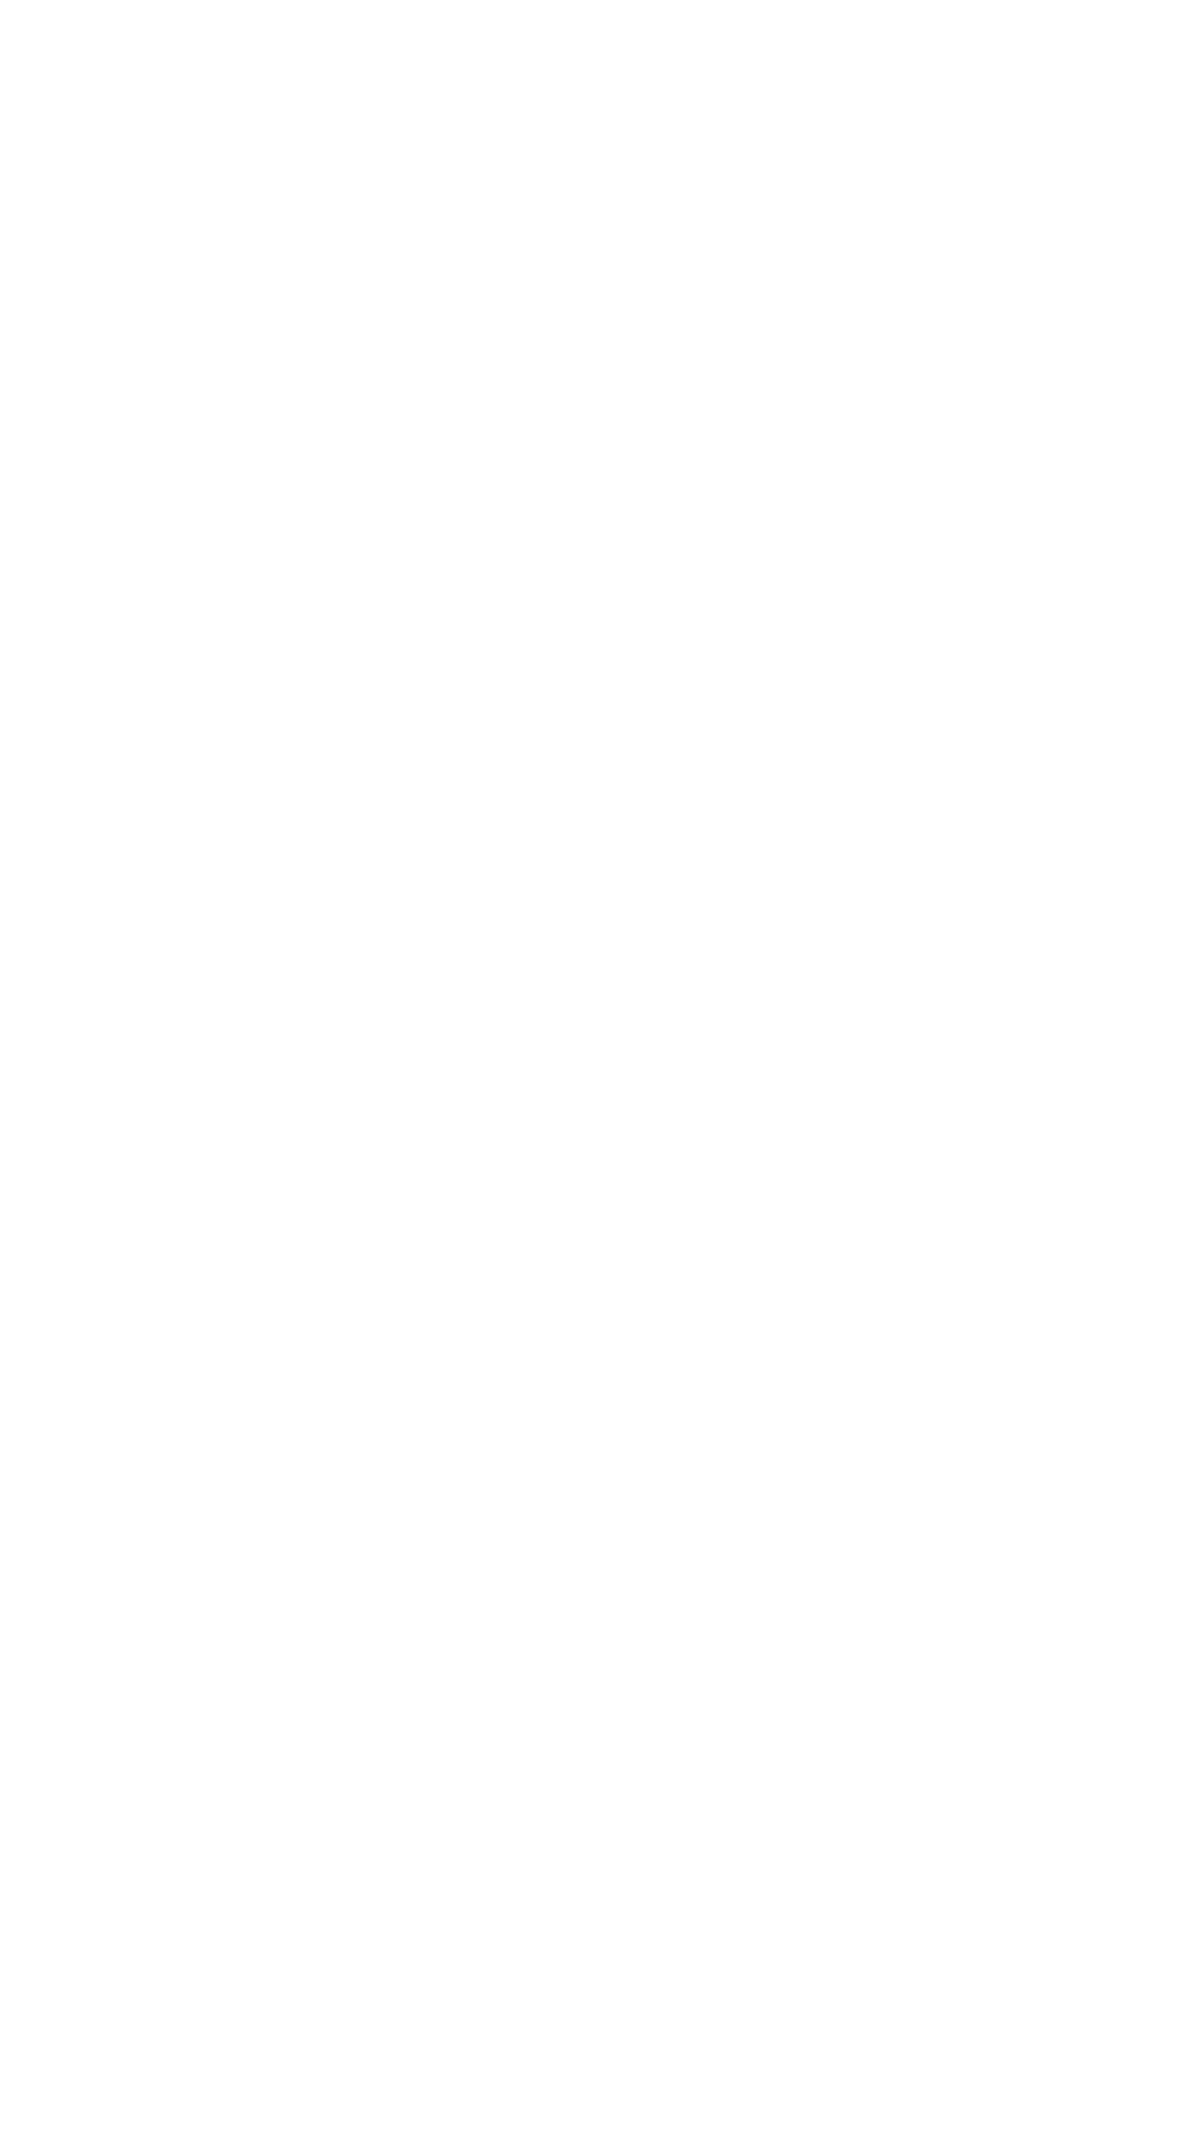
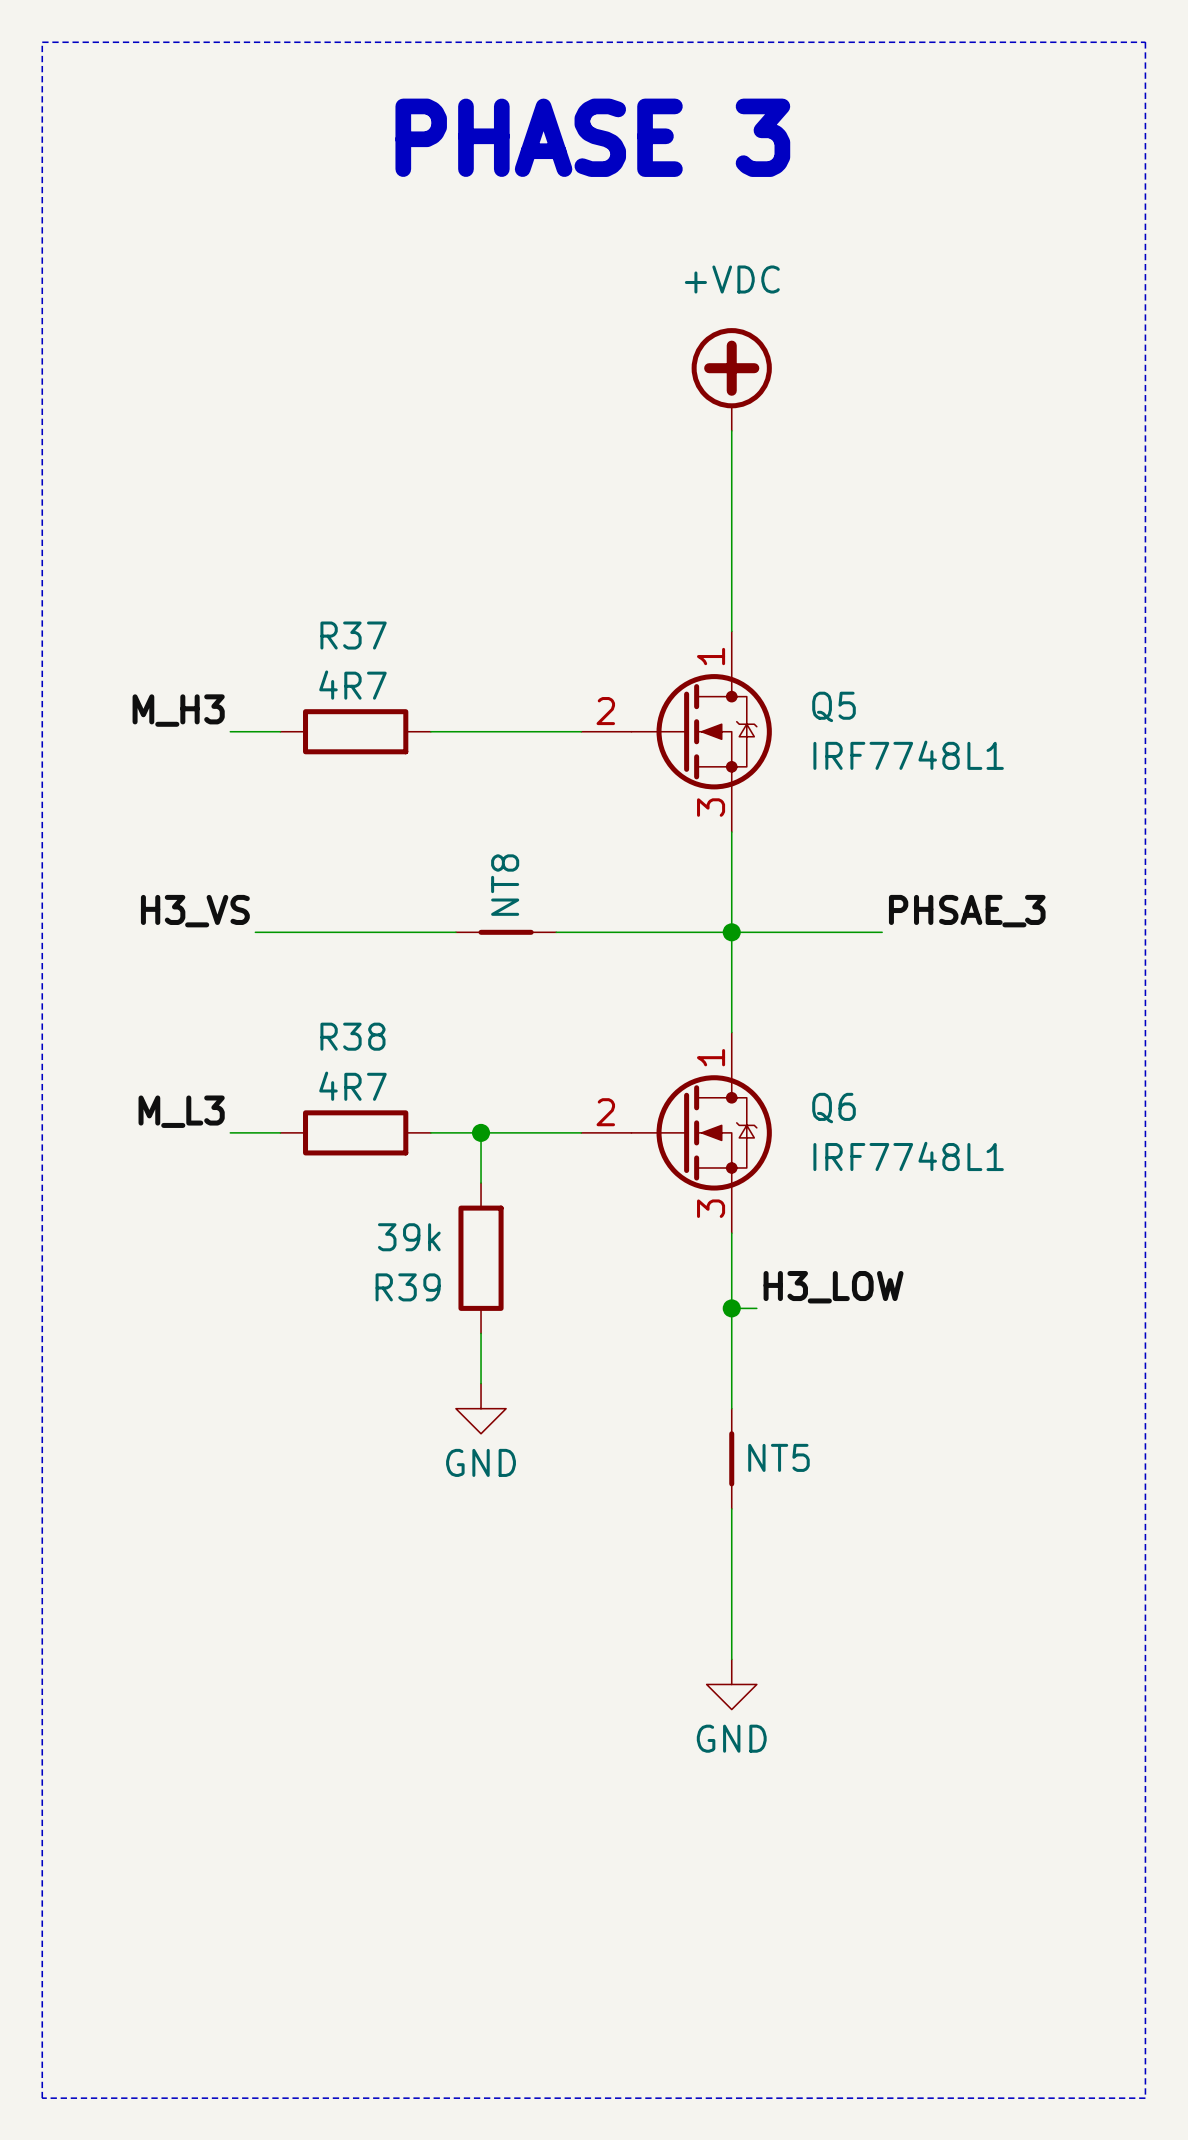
line: none -> (42, 42) (1145, 42) (1145, 2098) (42, 2098) (42, 42)
text: none -> PHASE 3 (592, 137)
power symbol: none -> +VDC (731, 379)
wire: none -> (731, 430) (731, 631)
label: none -> M_H3 (178, 710)
wire: none -> (230, 731) (280, 731)
R37: none -> 4R7 (355, 731)
wire: none -> (430, 731) (581, 731)
Q5: none -> IRF7748L1 (676, 731)
wire: none -> (731, 832) (731, 1032)
label: none -> H3_VS (195, 911)
label: none -> PHSAE_3 (967, 911)
wire: none -> (255, 932) (455, 932)
NT8: none -> (506, 932)
wire: none -> (556, 932) (882, 932)
junction: none -> (731, 932)
label: none -> M_L3 (181, 1111)
wire: none -> (230, 1132) (280, 1132)
R38: none -> 4R7 (355, 1132)
wire: none -> (430, 1132) (581, 1132)
wire: none -> (481, 1132) (481, 1183)
junction: none -> (481, 1132)
Q6: none -> IRF7748L1 (676, 1132)
wire: none -> (731, 1233) (731, 1408)
R39: none -> 39k (481, 1258)
label: none -> H3_LOW (833, 1287)
wire: none -> (731, 1308) (756, 1308)
junction: none -> (731, 1308)
wire: none -> (481, 1333) (481, 1383)
power symbol: none -> GND (481, 1408)
NT5: none -> (731, 1458)
wire: none -> (731, 1508) (731, 1659)
power symbol: none -> GND (731, 1684)

